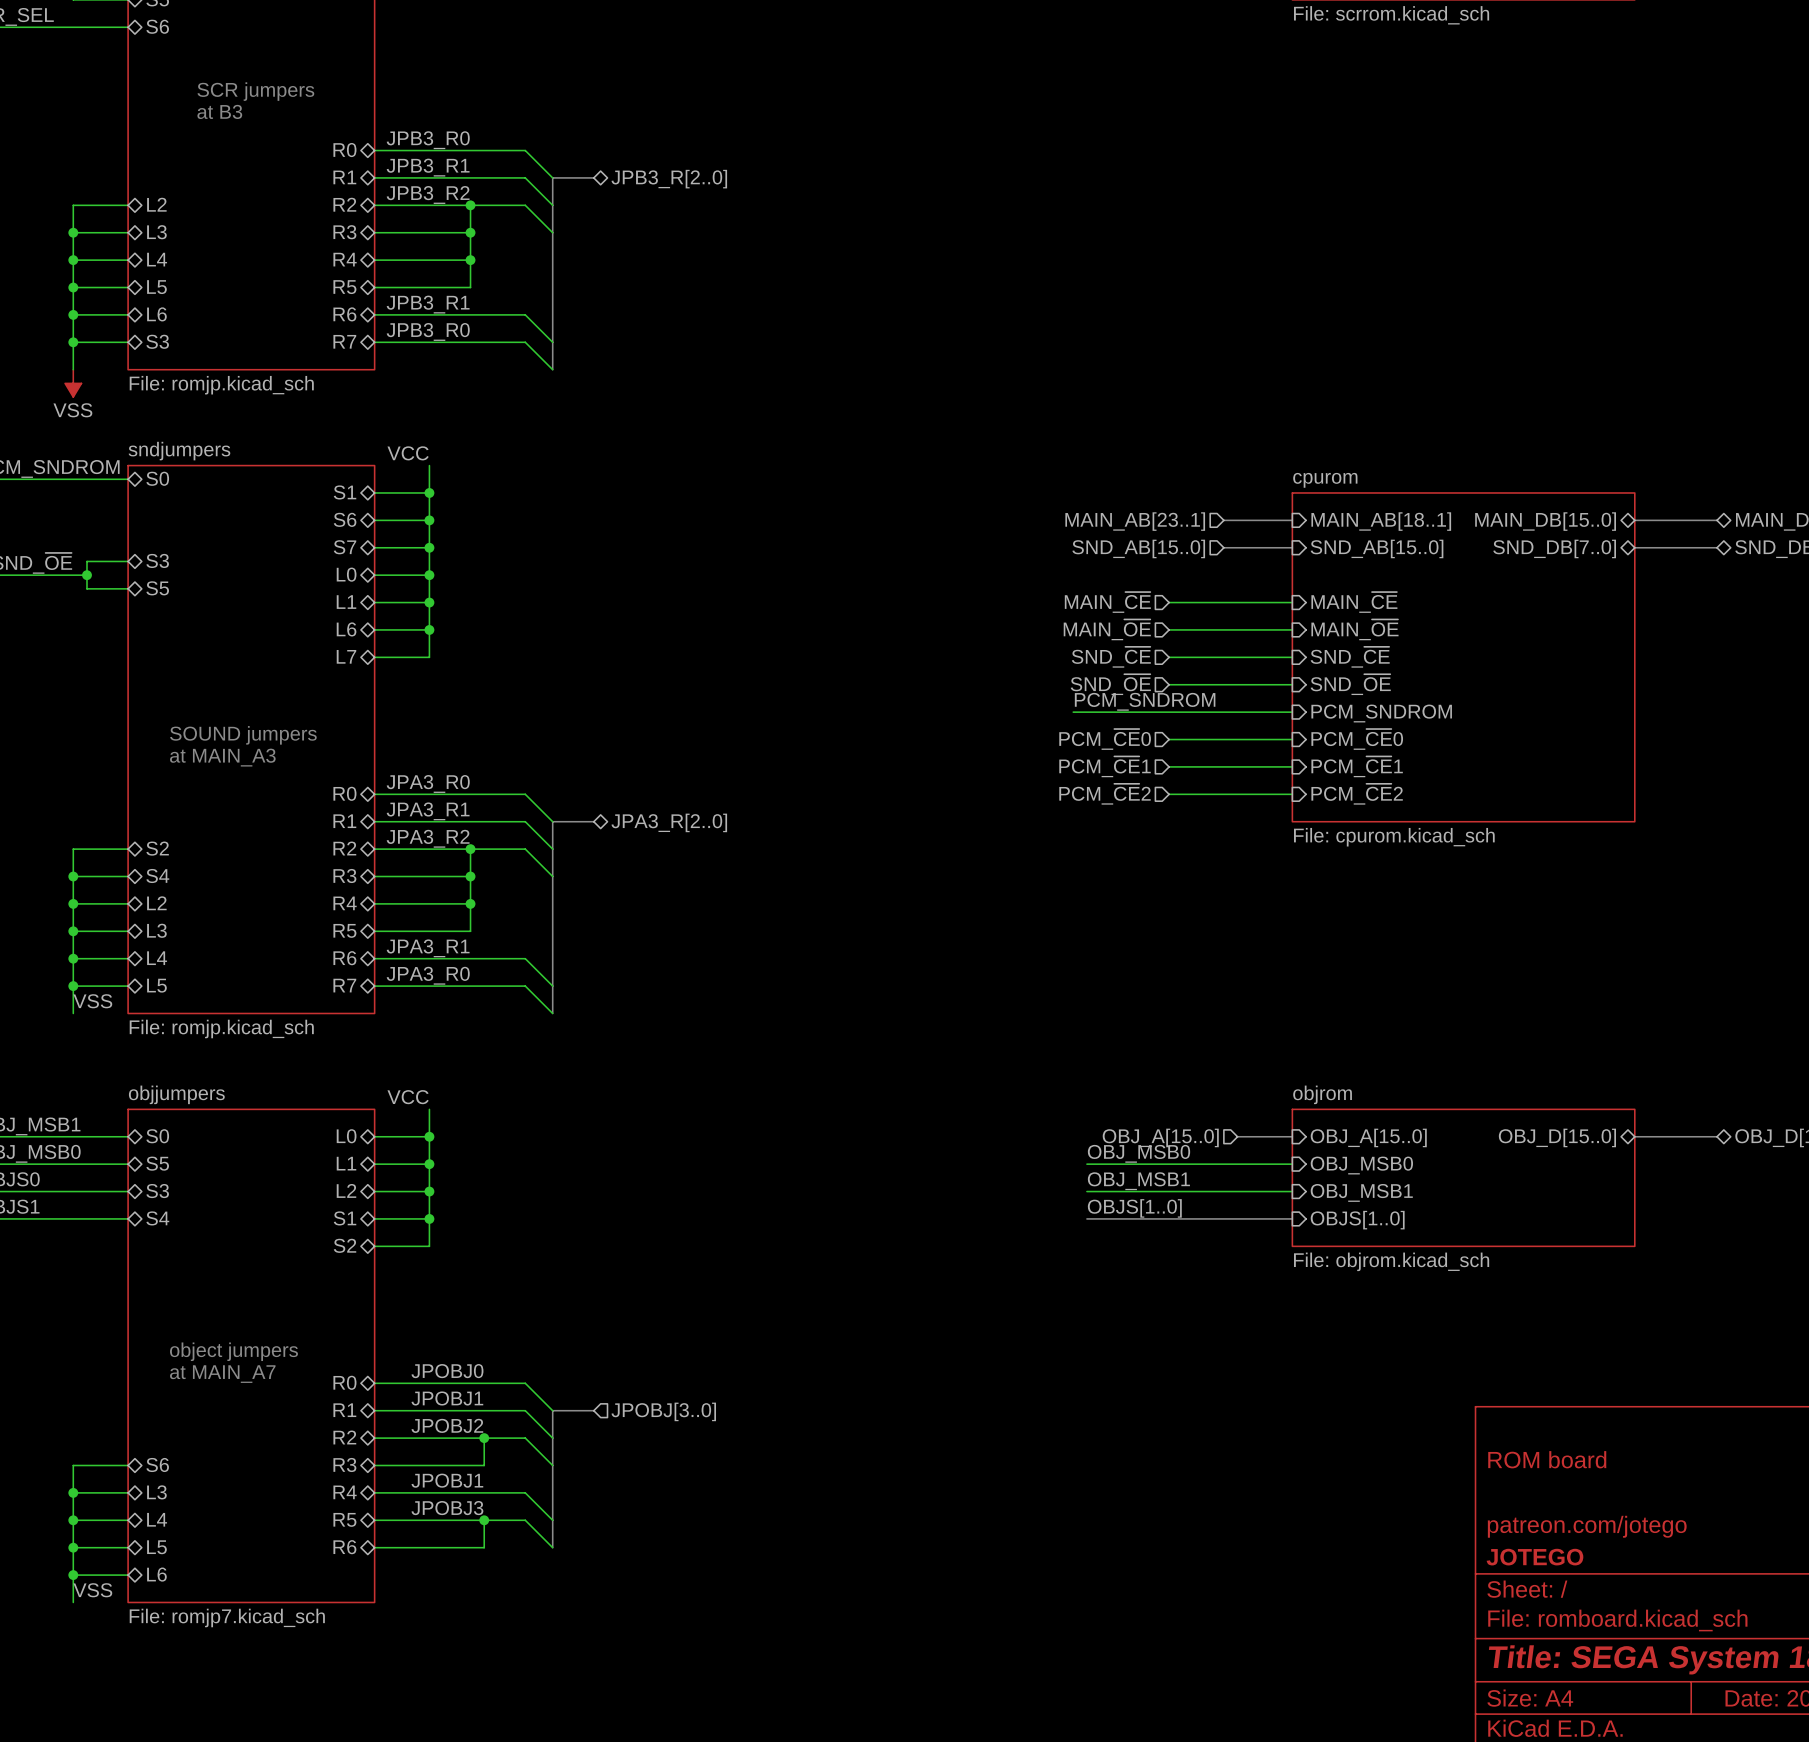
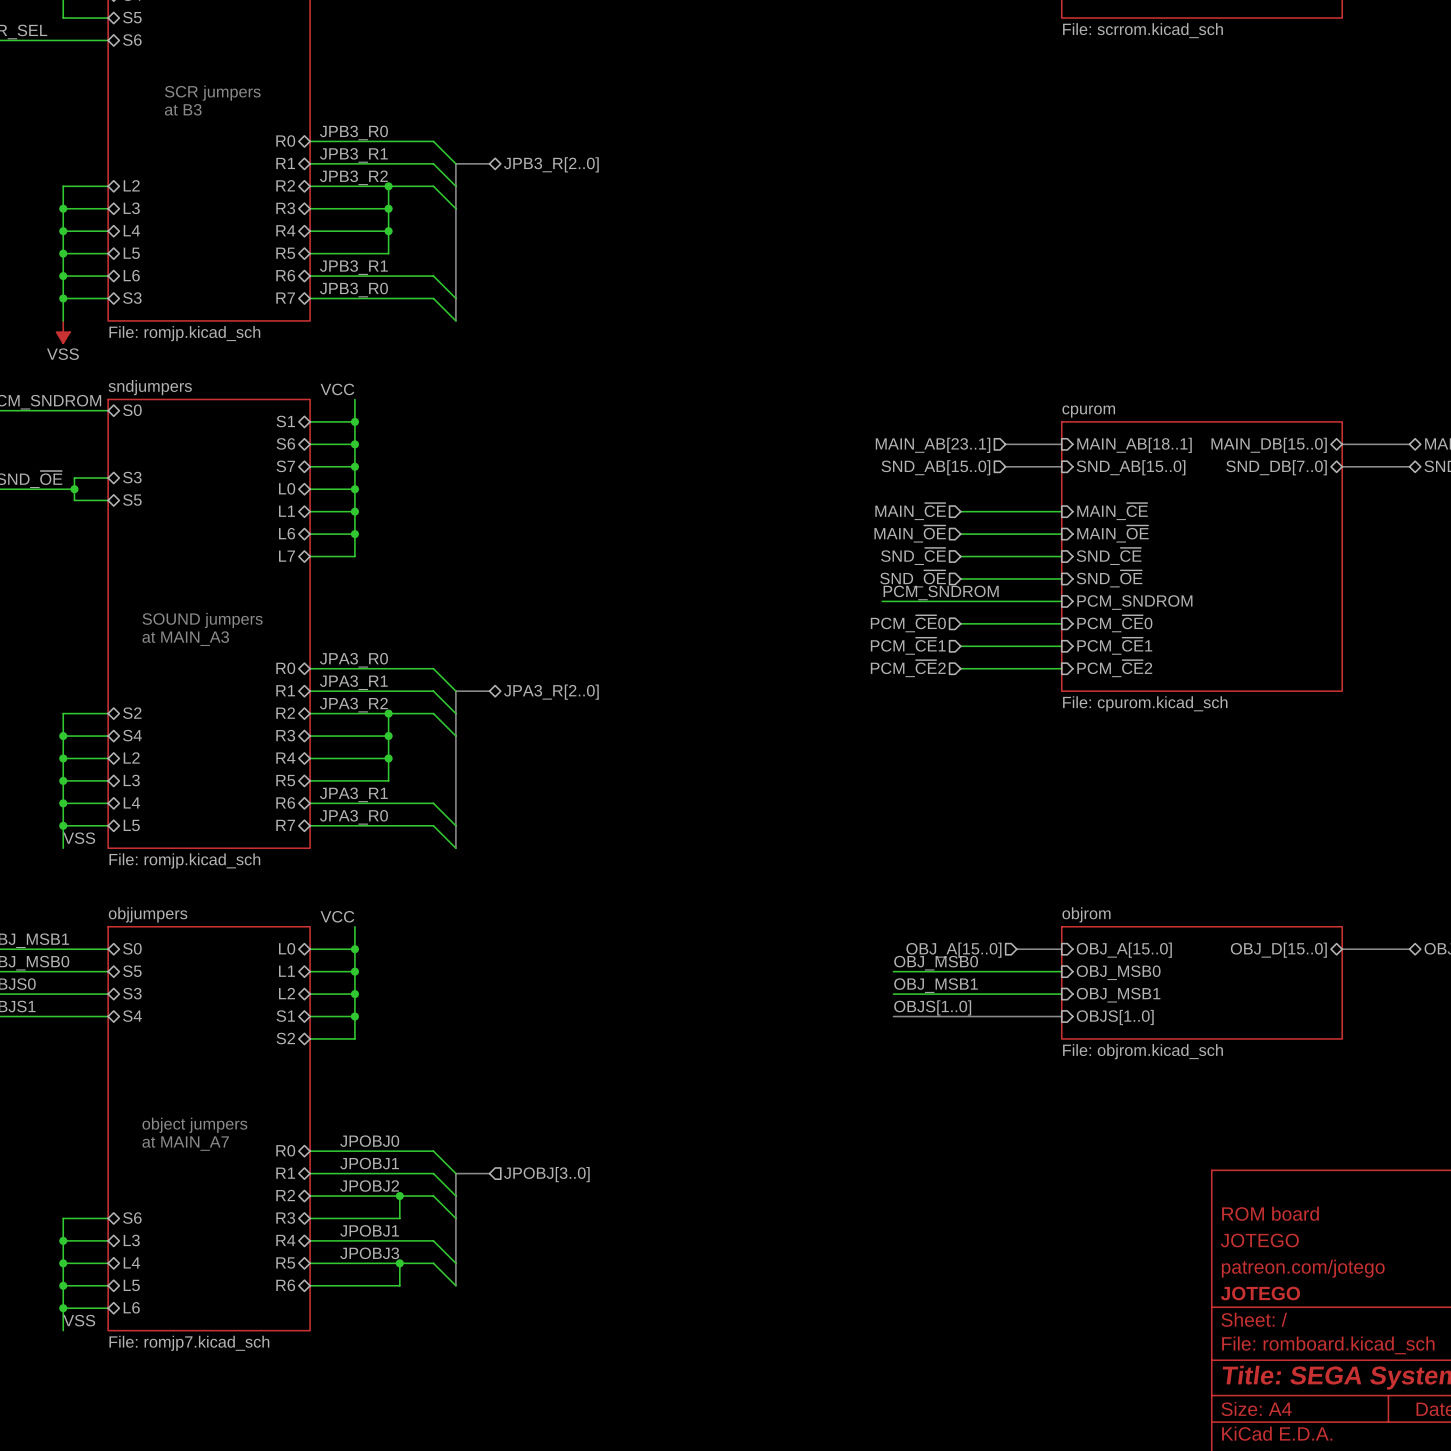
title block: none -> JOTEGO (1259, 1240)

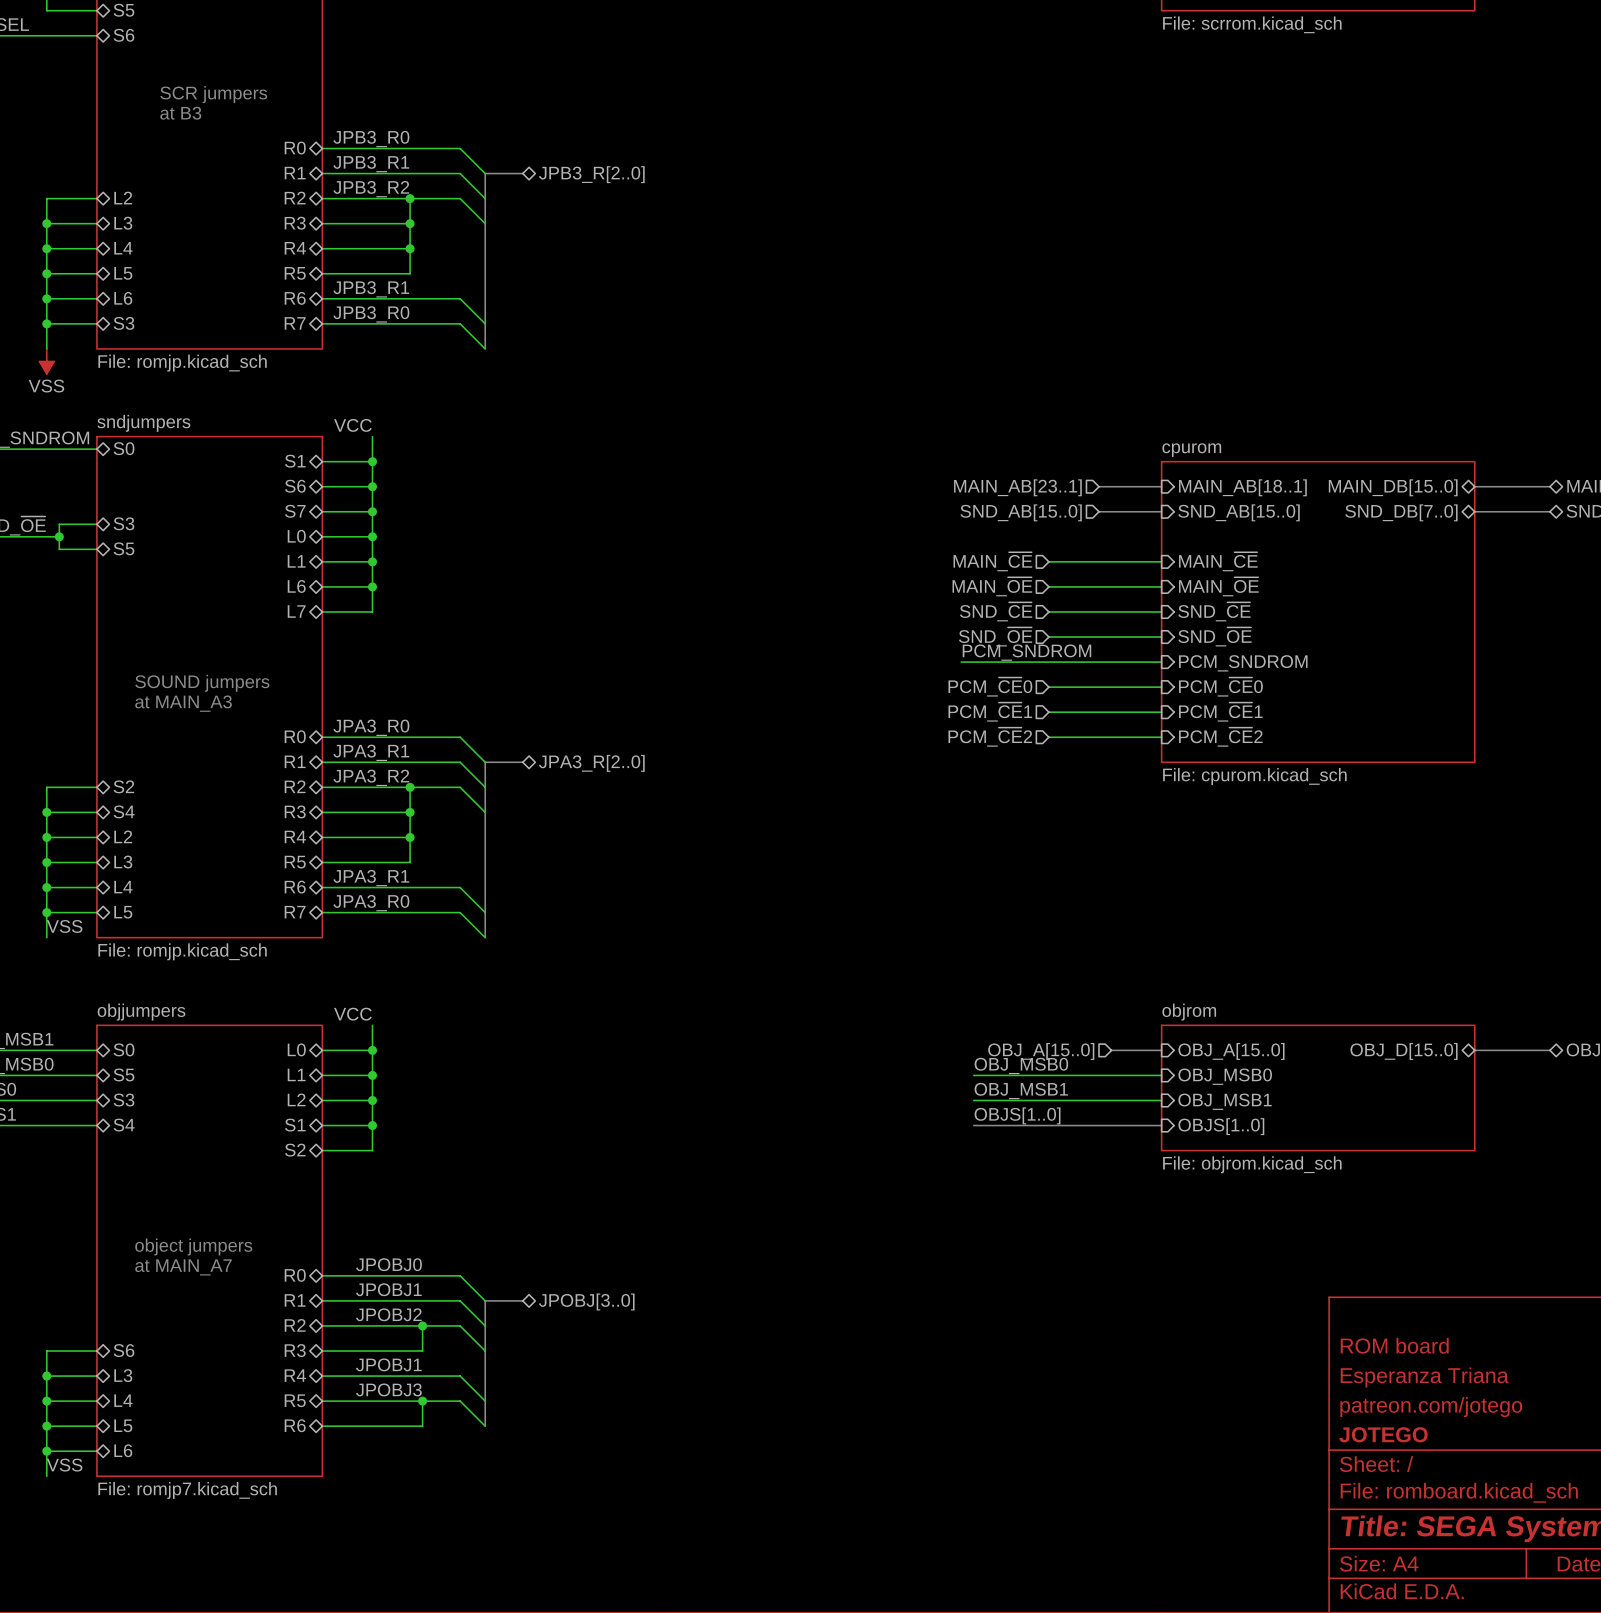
hierarchical label shape: input (546, 1174) -> bidirectional (586, 1302)
title block: JOTEGO (1259, 1240) -> Esperanza Triana (1424, 1377)

